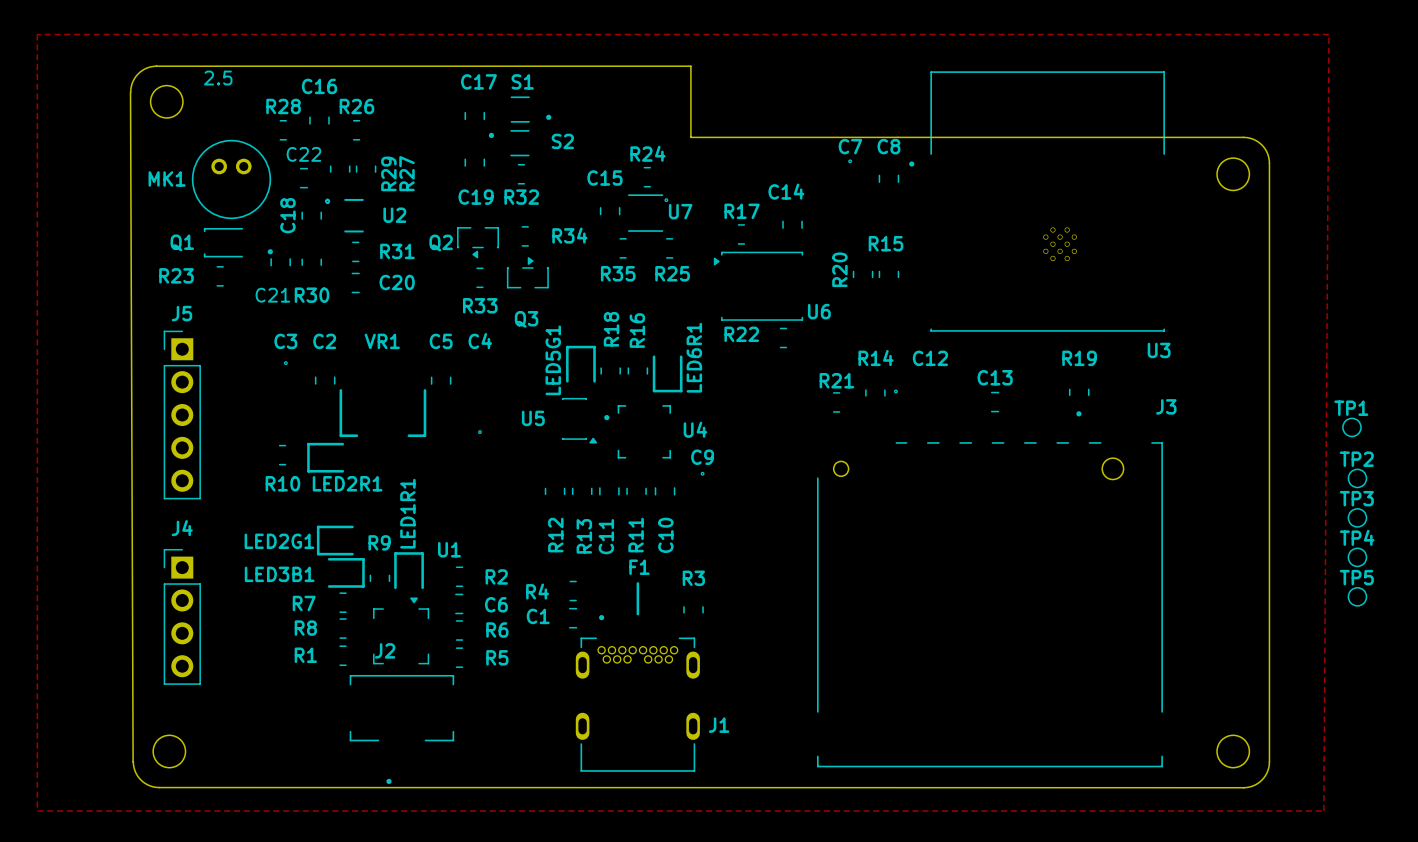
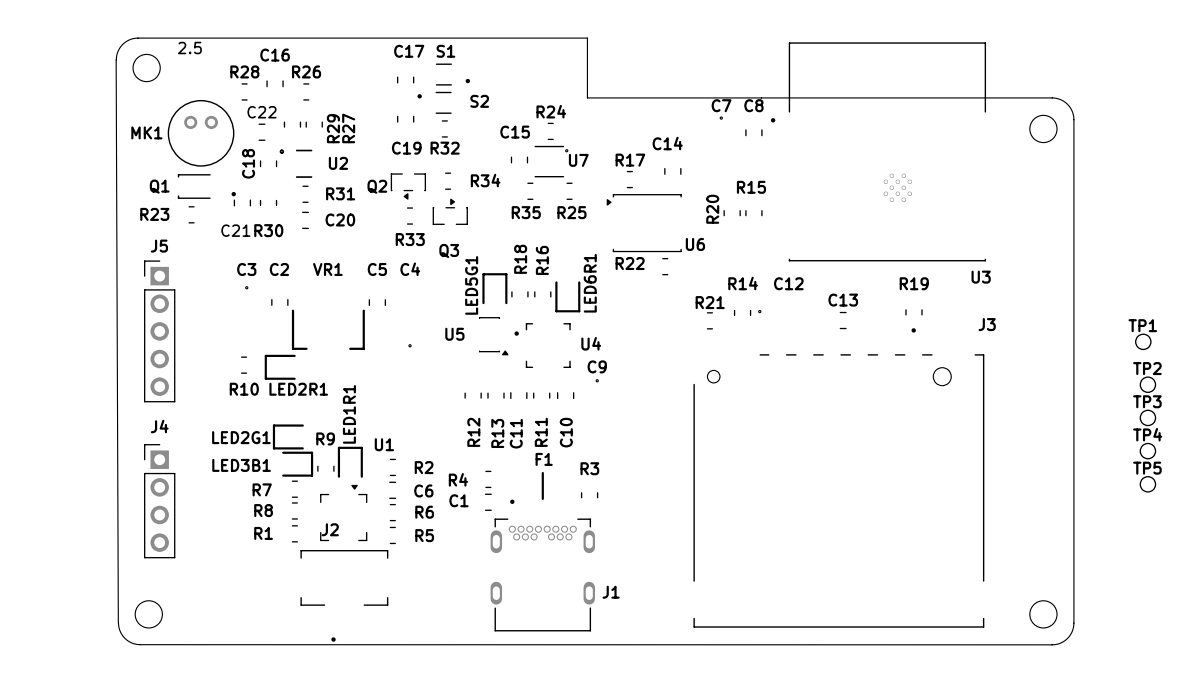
zone outline: (37, 34) (37, 811) (1323, 811) (1328, 34) (37, 34) -> none

